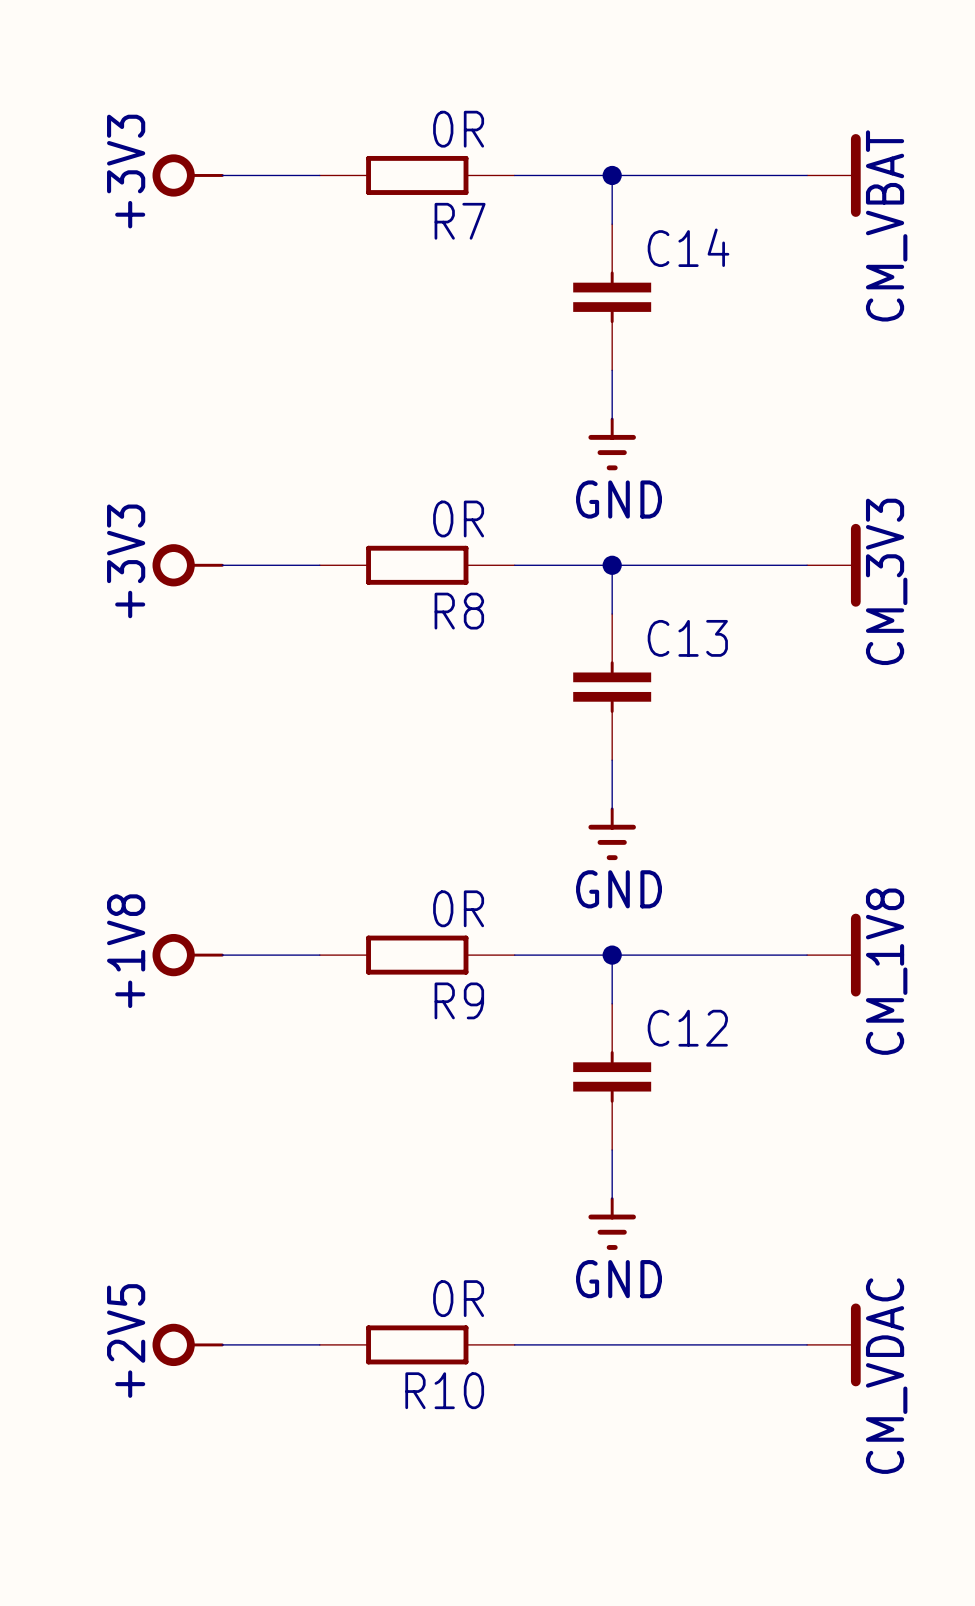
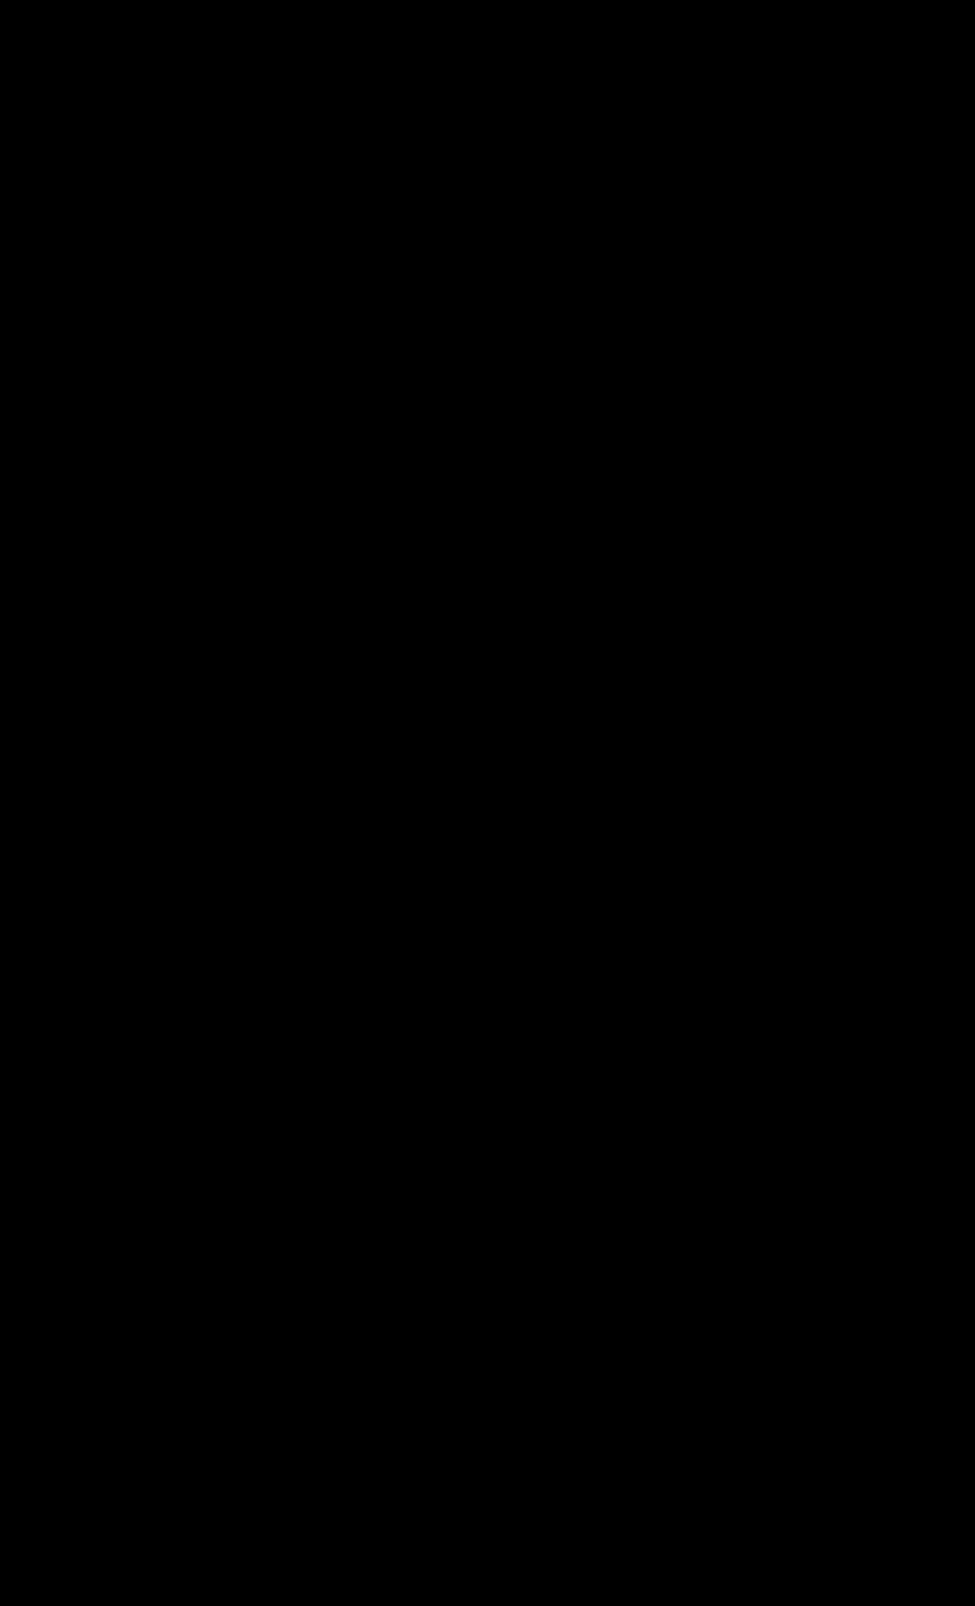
power symbol: +3V3 (188, 175) -> none
wire: (222, 175) (319, 175) -> none
R7: 0R (417, 175) -> none
wire: (514, 175) (807, 175) -> none
wire: (612, 175) (612, 224) -> none
junction: (612, 175) -> none
power symbol: CM_VBAT (833, 175) -> none
C14: (612, 297) -> none
wire: (612, 370) (612, 419) -> none
power symbol: GND (612, 443) -> none
power symbol: +3V3 (188, 565) -> none
wire: (222, 565) (319, 565) -> none
R8: 0R (417, 565) -> none
wire: (514, 565) (807, 565) -> none
wire: (612, 565) (612, 614) -> none
junction: (612, 565) -> none
power symbol: CM_3V3 (833, 565) -> none
C13: (612, 687) -> none
wire: (612, 760) (612, 808) -> none
power symbol: GND (612, 833) -> none
power symbol: +1V8 (188, 955) -> none
wire: (222, 955) (319, 955) -> none
R9: 0R (417, 955) -> none
wire: (514, 955) (807, 955) -> none
wire: (612, 955) (612, 1003) -> none
junction: (612, 955) -> none
power symbol: CM_1V8 (833, 955) -> none
C12: (612, 1076) -> none
wire: (612, 1150) (612, 1198) -> none
power symbol: GND (612, 1223) -> none
power symbol: +2V5 (188, 1344) -> none
wire: (222, 1344) (319, 1344) -> none
R10: 0R (417, 1344) -> none
wire: (514, 1344) (807, 1344) -> none
power symbol: CM_VDAC (833, 1344) -> none

